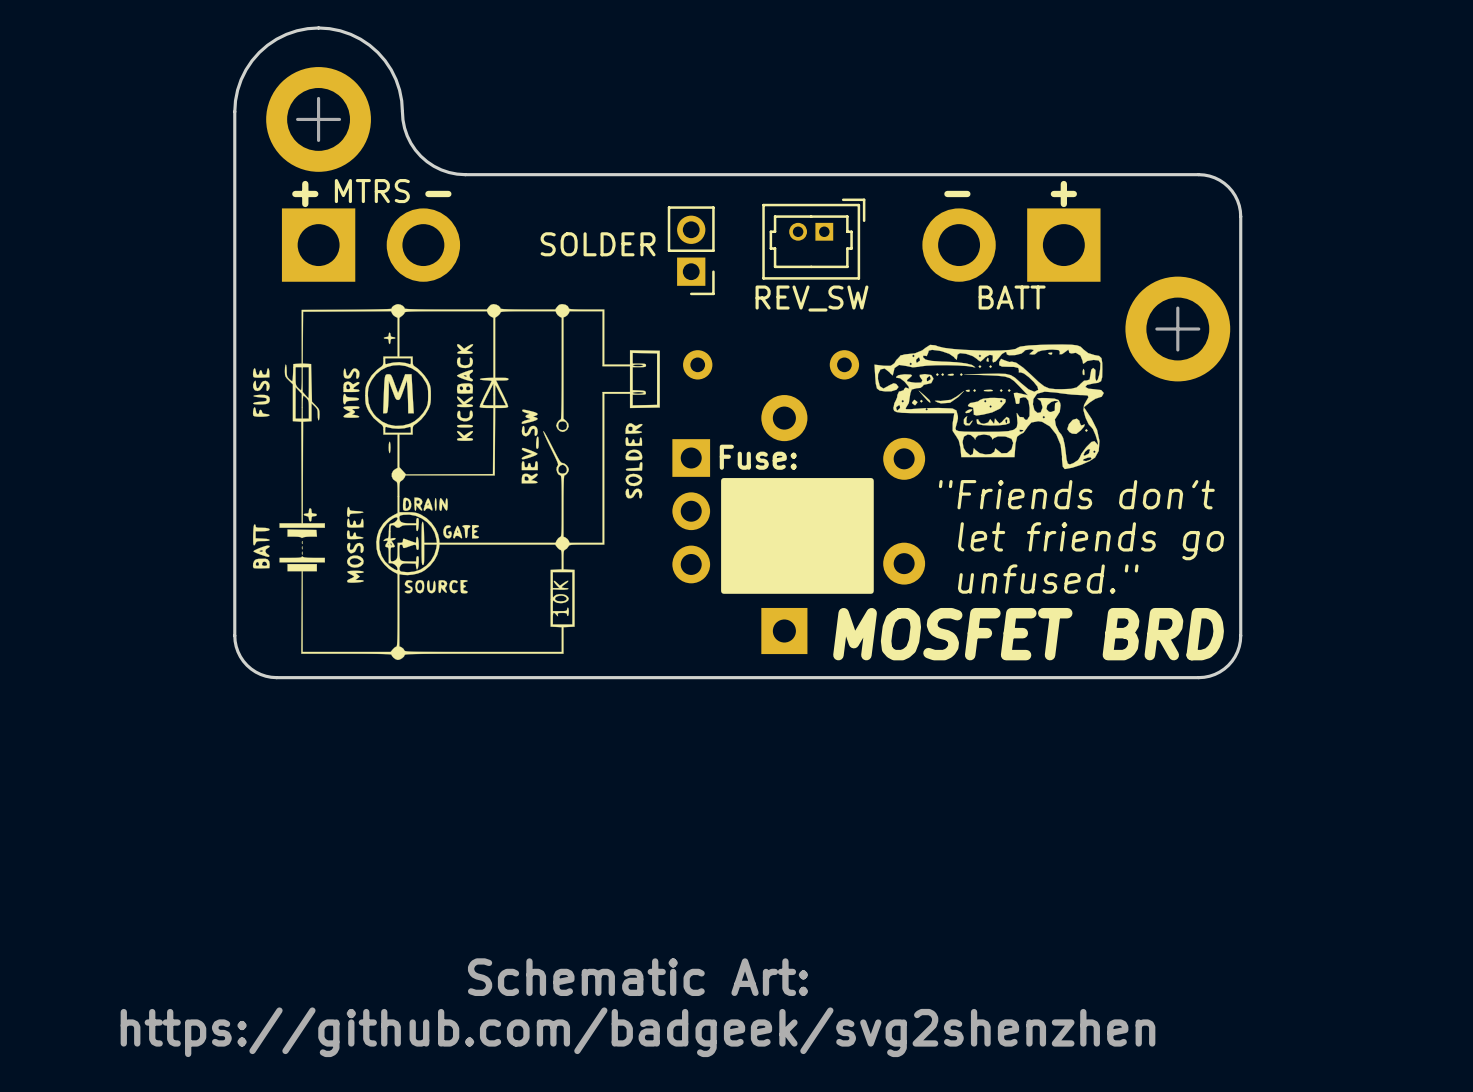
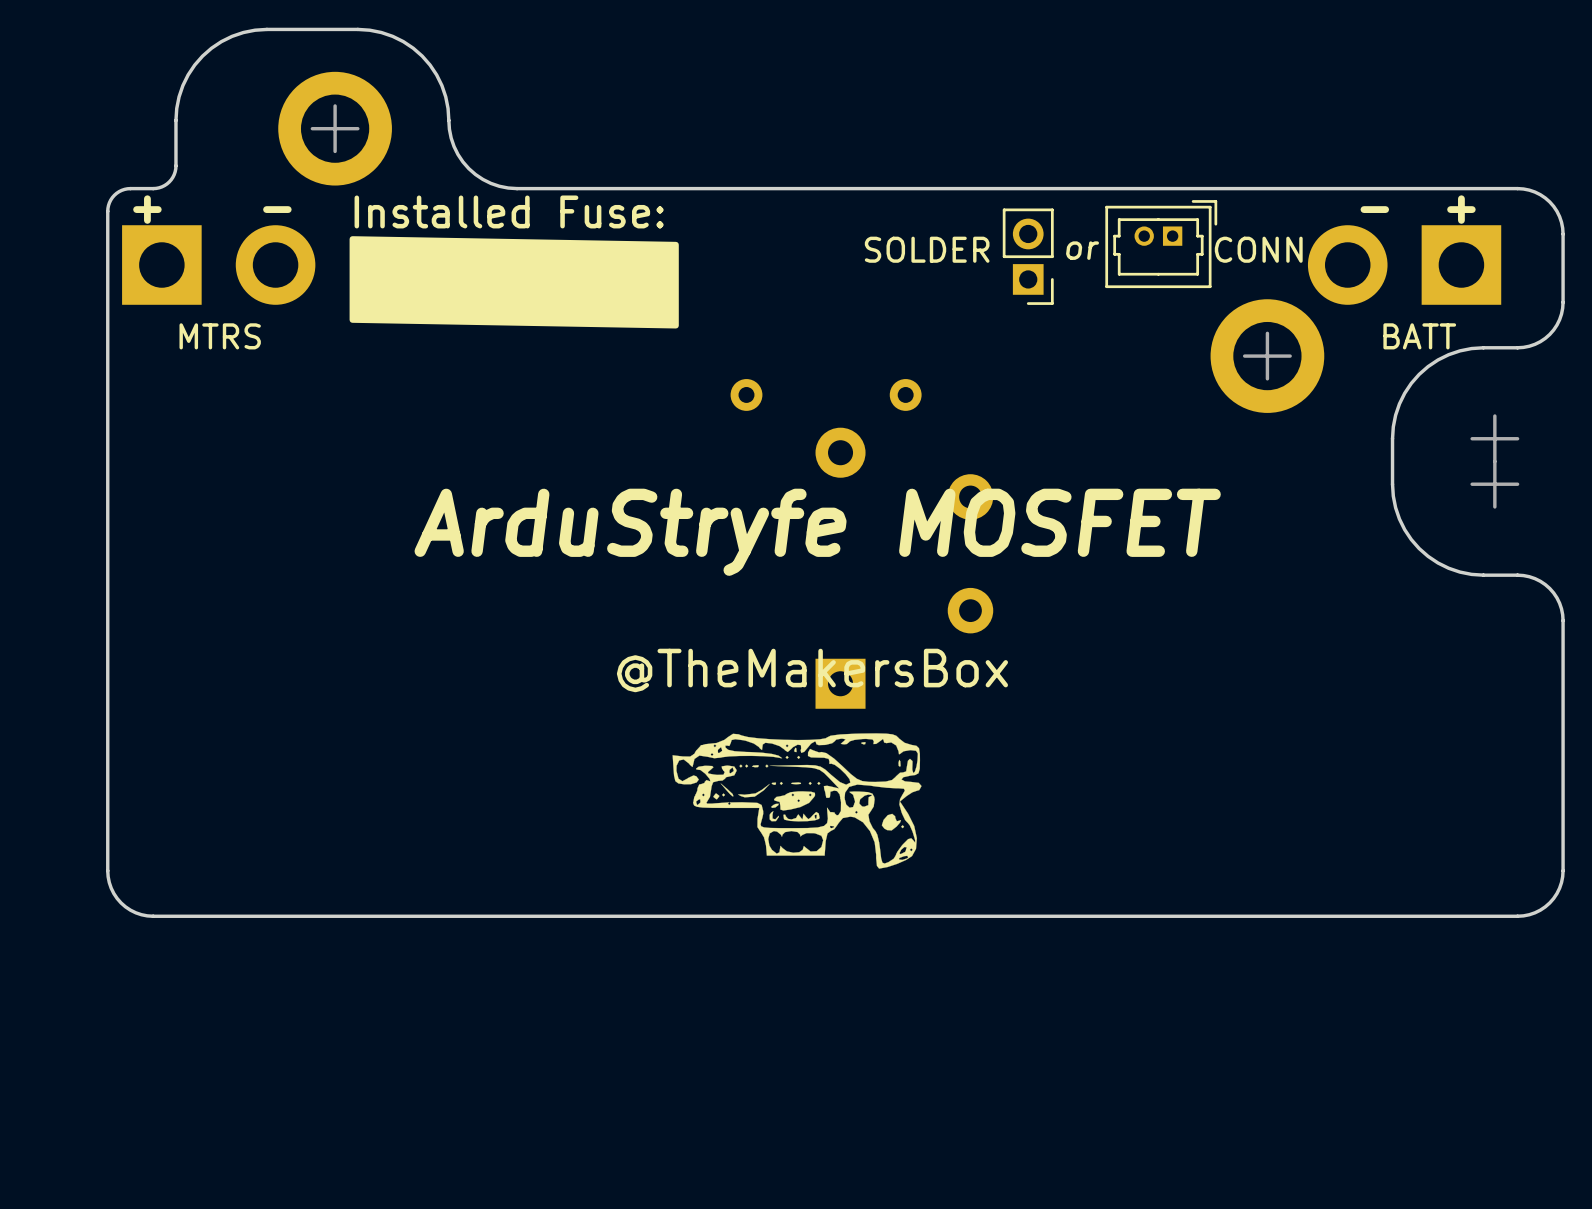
board edge: (486, 174) (449, 172) (433, 166) (420, 156) (407, 135) (402, 119) (399, 90) (391, 69) (369, 45) (350, 34) (318, 27) (286, 34) (259, 52) (241, 79) (234, 111) (234, 635) (240, 656) (251, 668) (260, 674) (276, 677) (1198, 677) (1219, 672) (1235, 656) (1240, 635) (1240, 216) (1237, 200) (1228, 186) (1214, 177) (1198, 174) -> (517, 188) (490, 183) (475, 174) (462, 161) (451, 138) (445, 96) (436, 74) (422, 56) (403, 41) (381, 32) (369, 30) (266, 29) (243, 32) (221, 41) (202, 56) (188, 74) (179, 96) (176, 108) (175, 168) (169, 181) (156, 188) (124, 189) (116, 193) (110, 199) (107, 211) (107, 870) (109, 882) (113, 893) (121, 902) (130, 910) (141, 914) (153, 916) (1517, 916) (1529, 914) (1540, 910) (1553, 898) (1559, 888) (1562, 876) (1561, 608) (1556, 597) (1549, 588) (1535, 578) (1523, 575) (1483, 575) (1459, 572) (1438, 562) (1419, 548) (1404, 529) (1395, 507) (1392, 484) (1392, 438) (1395, 415) (1404, 393) (1411, 383) (1428, 366) (1448, 354) (1459, 350) (1471, 348) (1529, 346) (1540, 341) (1553, 329) (1559, 319) (1563, 302) (1563, 234) (1559, 216) (1553, 206) (1545, 198) (1535, 192) (1523, 188) (1290, 188)
text position: MTRS (372, 191) -> MTRS (220, 336)
text position: + (305, 193) -> + (147, 209)
text position: - (438, 193) -> - (277, 209)
text position: - (957, 193) -> - (1374, 209)
text position: + (1063, 193) -> + (1461, 209)
text: none -> Installed Fuse: (509, 211)
drawing: none -> [349, 236, 679, 329]
part: none -> CONN (1161, 244)
text: none -> or (1082, 250)
part: REV_SW (813, 239) -> none
part position: (371, 245) -> (218, 265)
part position: (1011, 245) -> (1404, 265)
part position: (691, 250) -> (1028, 256)
text position: BATT (1012, 297) -> BATT (1419, 336)
drawing: [252, 304, 660, 661] -> none
line: none -> (1494, 416) (1494, 506)
line: none -> (1472, 438) (1517, 438)
drawing position: (989, 406) -> (797, 800)
line: none -> (1472, 484) (1517, 484)
text: Fuse: (758, 457) -> none
drawing: [721, 478, 874, 594] -> none
text: none -> ArduStryfe MOSFET (817, 532)
text: "Friends don't (1076, 494) -> none
part: (691, 511) -> none
text: let friends go (1091, 541) -> none
text: unfused." (1048, 579) -> none
text: none -> @TheMakersBox (812, 670)
text: MOSFET BRD (1028, 634) -> none
text: Schematic Art: (637, 977) -> none
text: https://github.com/badgeek/svg2shenzhen (637, 1032) -> none

